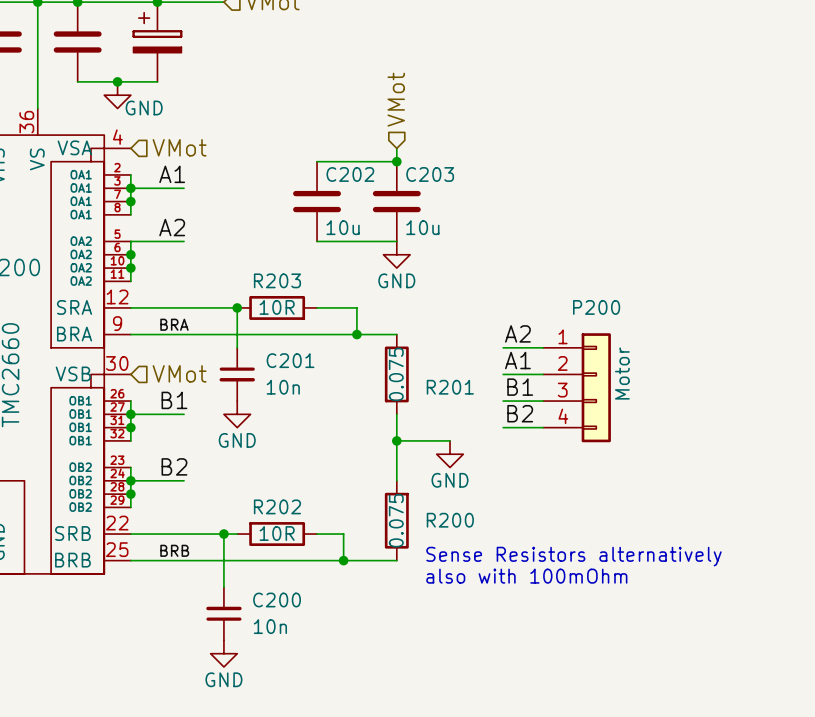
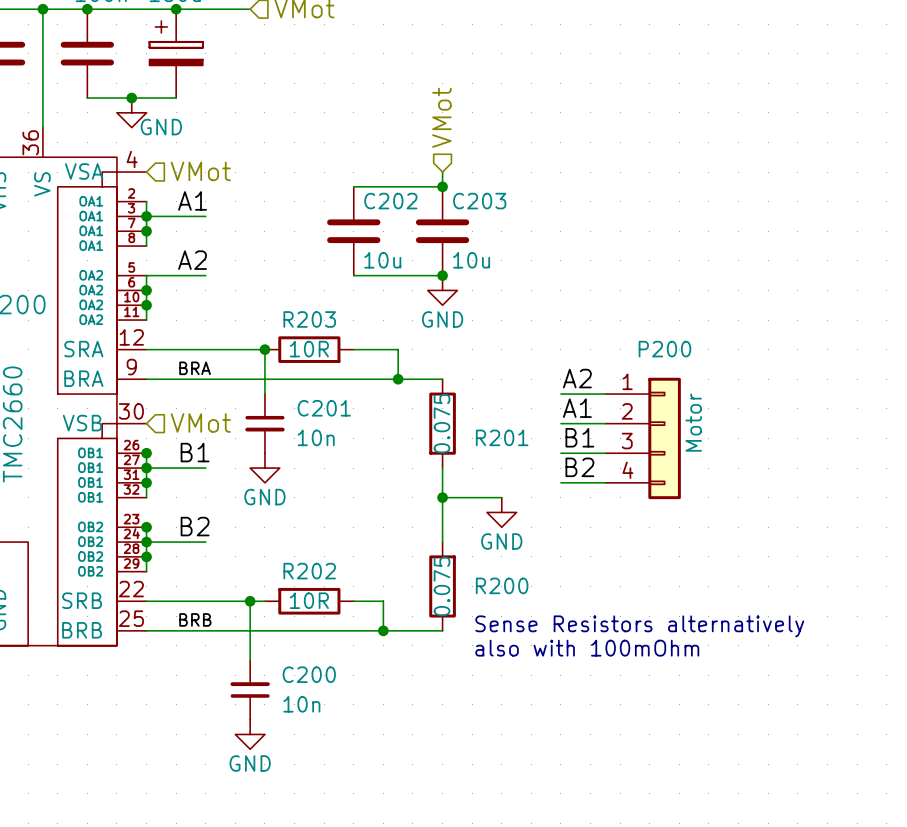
junction: none -> (442, 275)
junction: none -> (146, 453)
junction: none -> (146, 527)

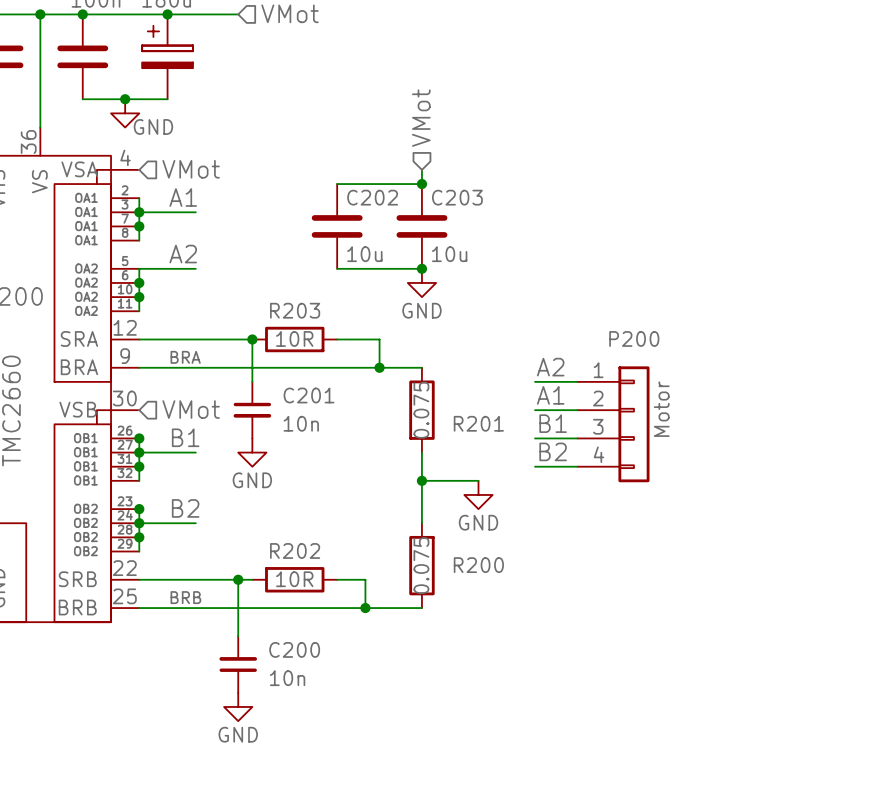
text: Sense Resistors alternatively (639, 626) -> none
text: also with 100mOhm (587, 648) -> none

